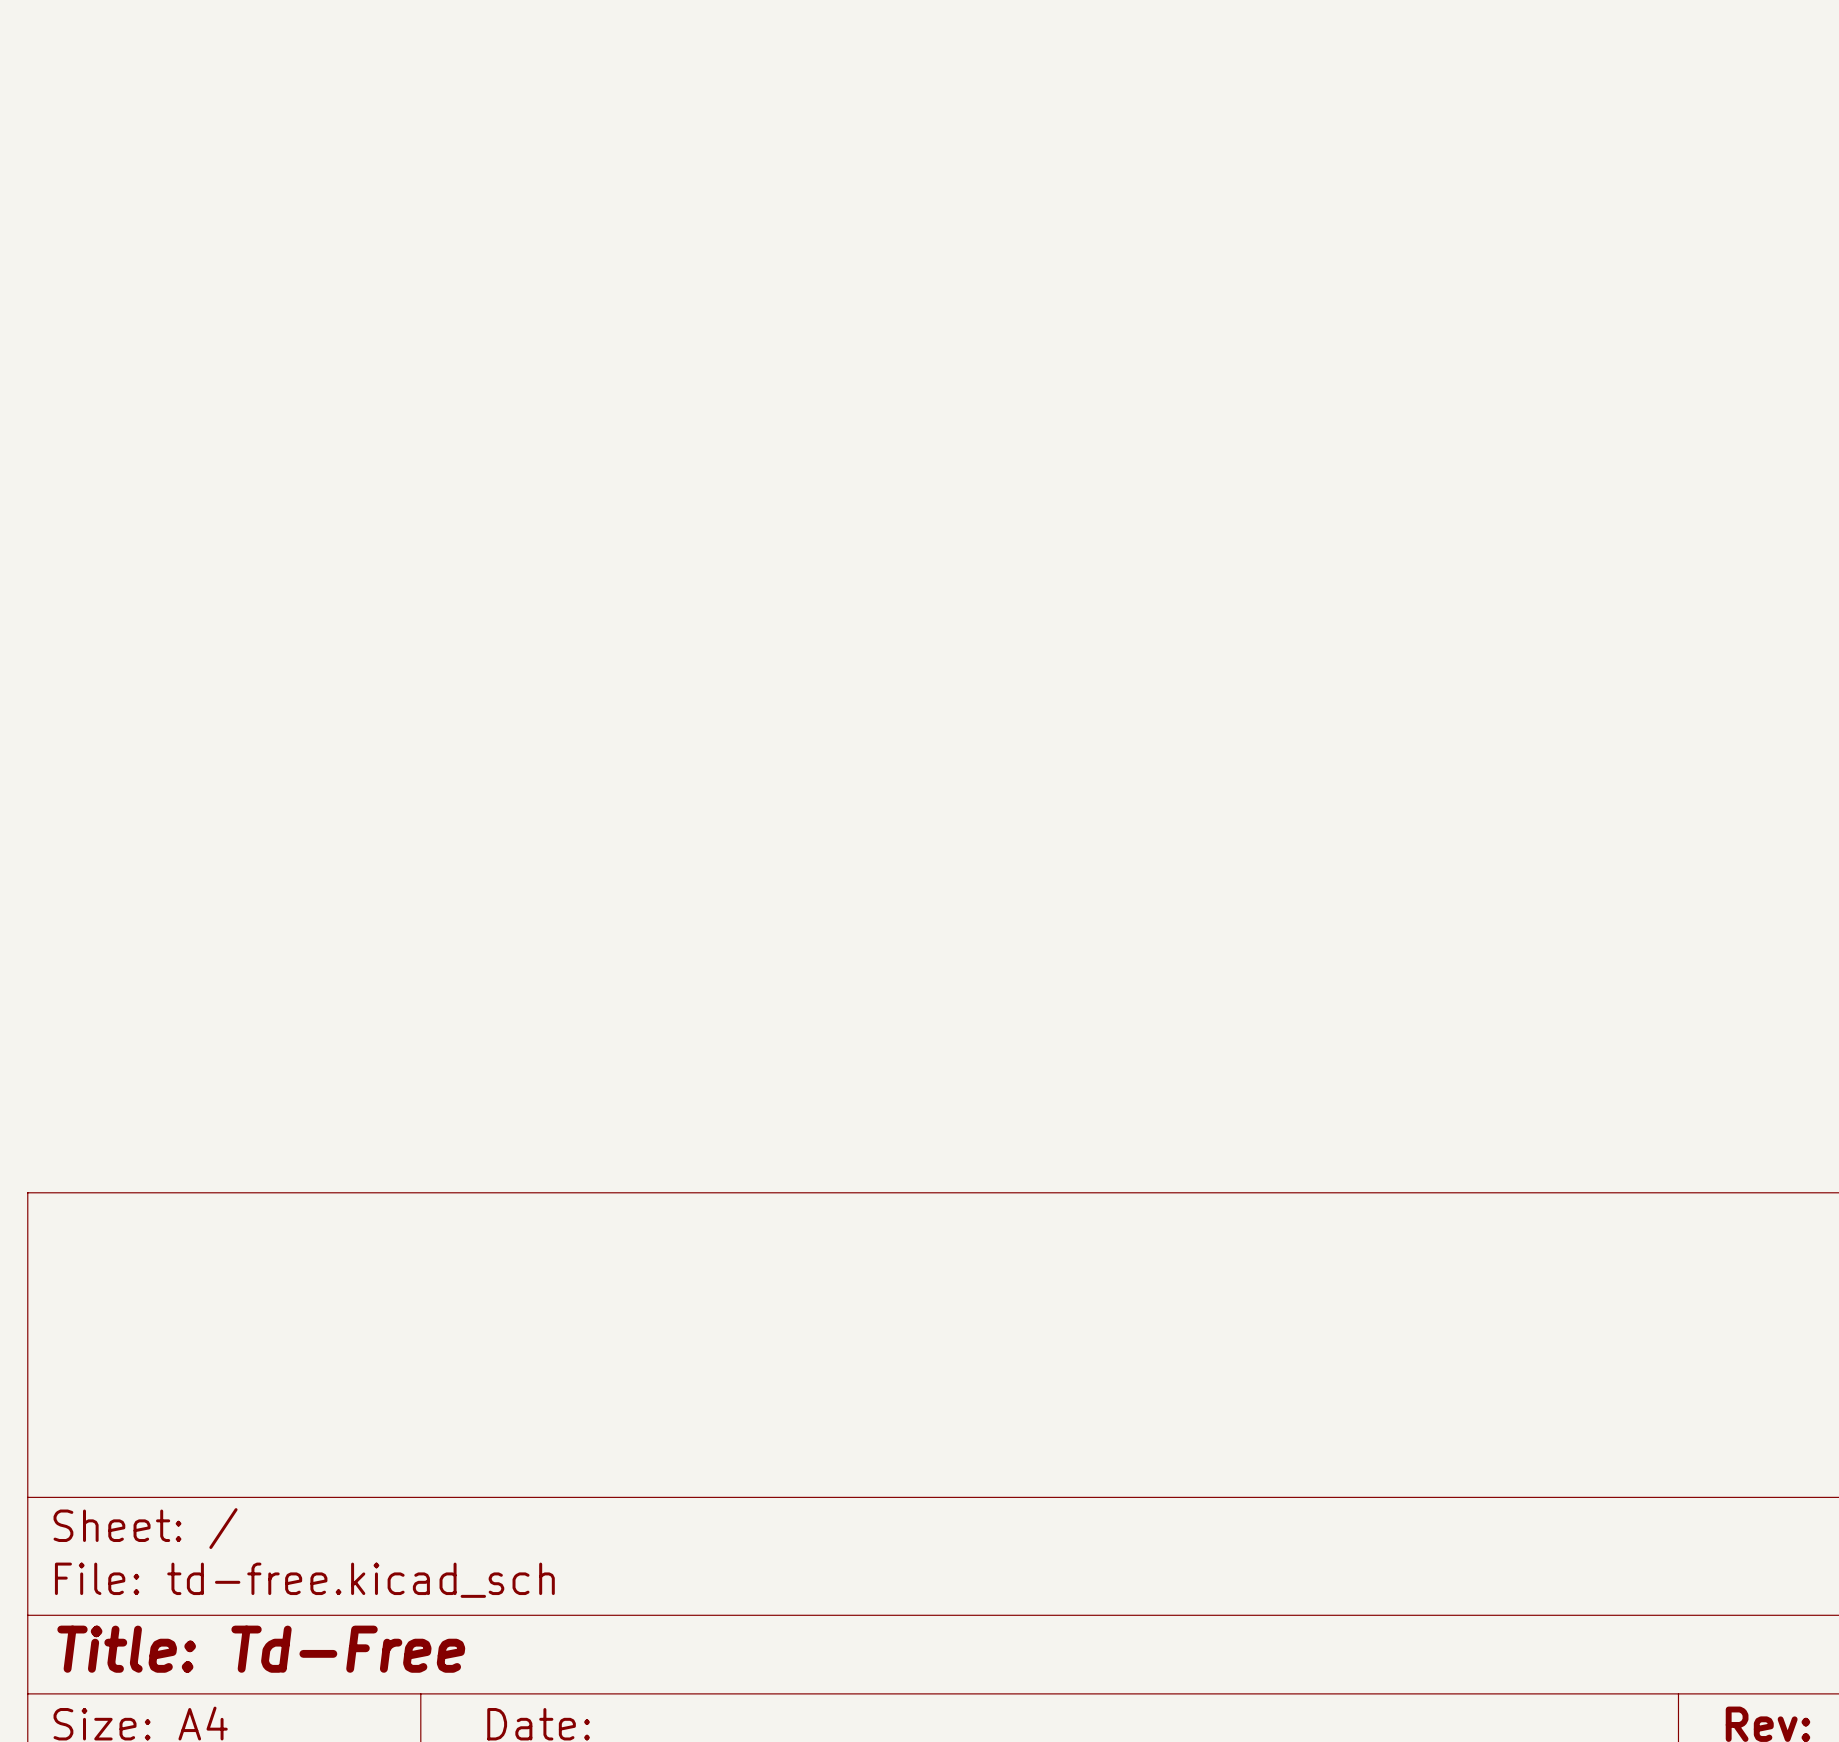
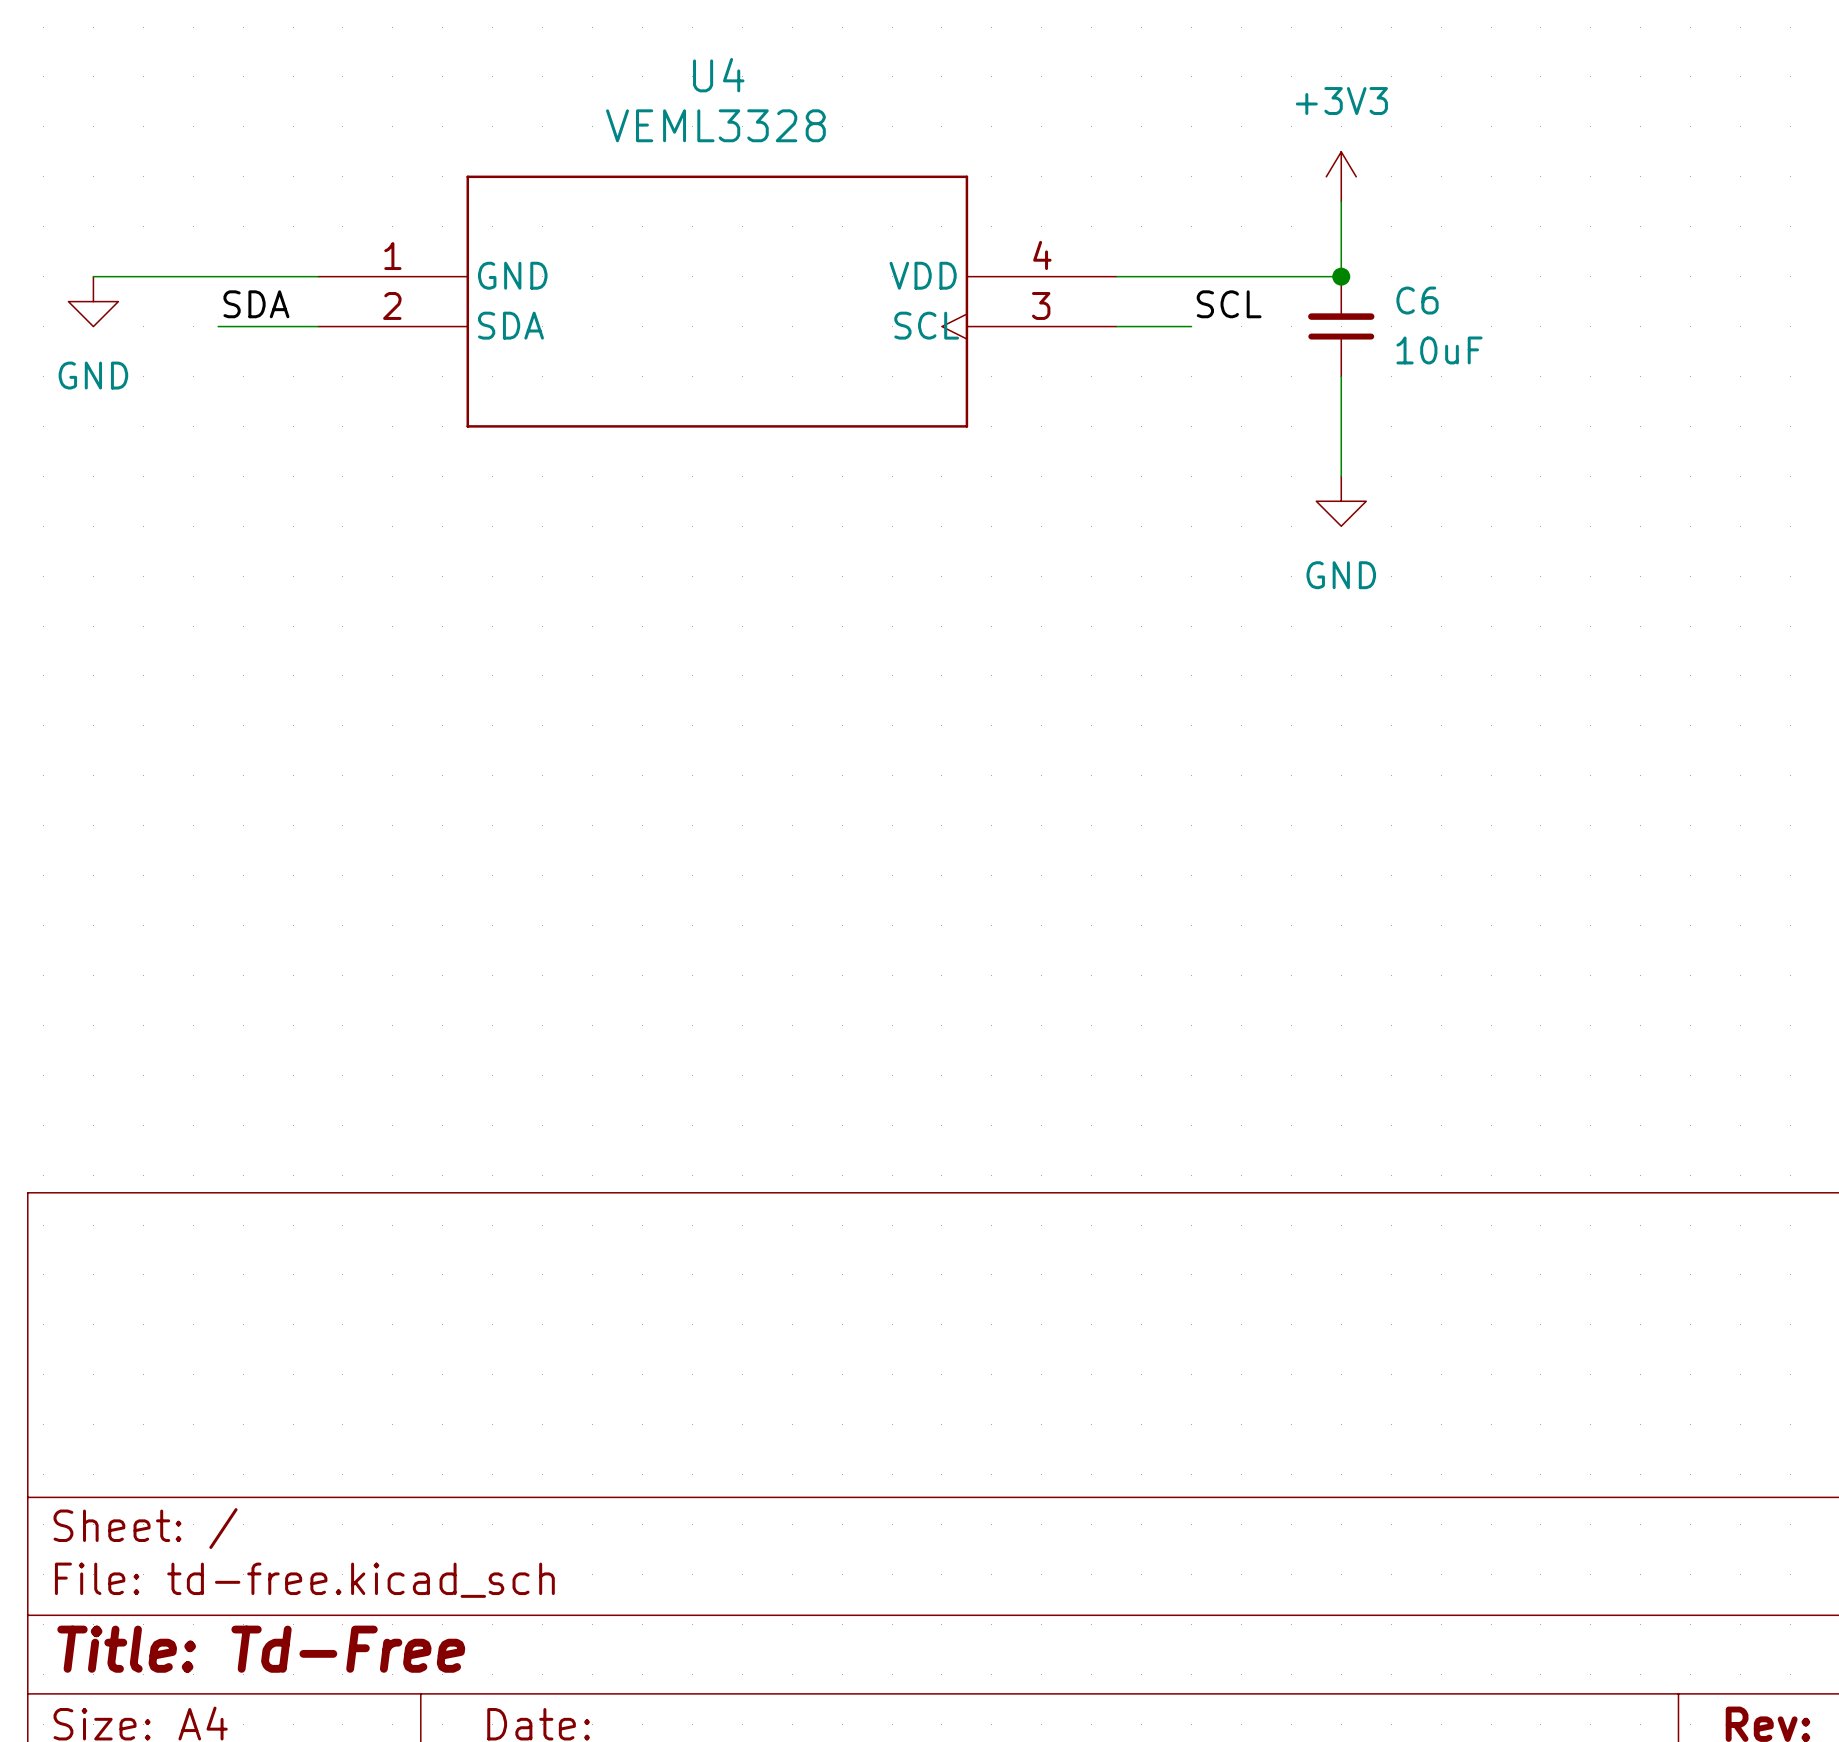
power symbol: none -> +3V3 (1341, 176)
wire: none -> (1341, 201) (1341, 276) (1116, 276)
wire: none -> (93, 276) (318, 276)
junction: none -> (1341, 276)
power symbol: none -> GND (93, 301)
U4: none -> VEML3328 (717, 301)
label: none -> SDA (256, 304)
label: none -> SCL (1229, 304)
wire: none -> (218, 326) (318, 326)
wire: none -> (1116, 326) (1191, 326)
C6: none -> 10uF (1341, 326)
wire: none -> (1341, 376) (1341, 476)
power symbol: none -> GND (1341, 501)

